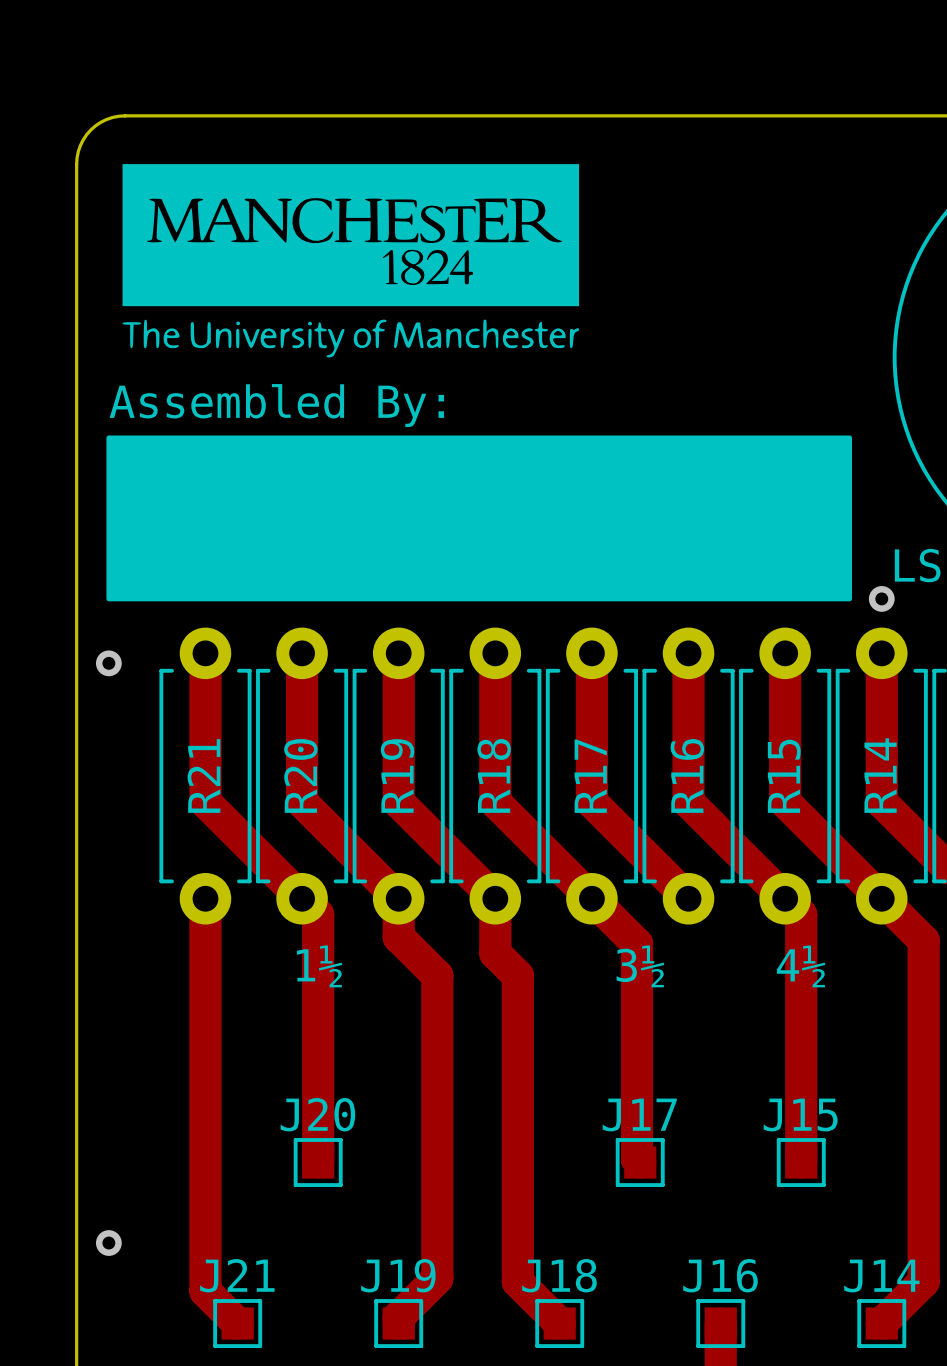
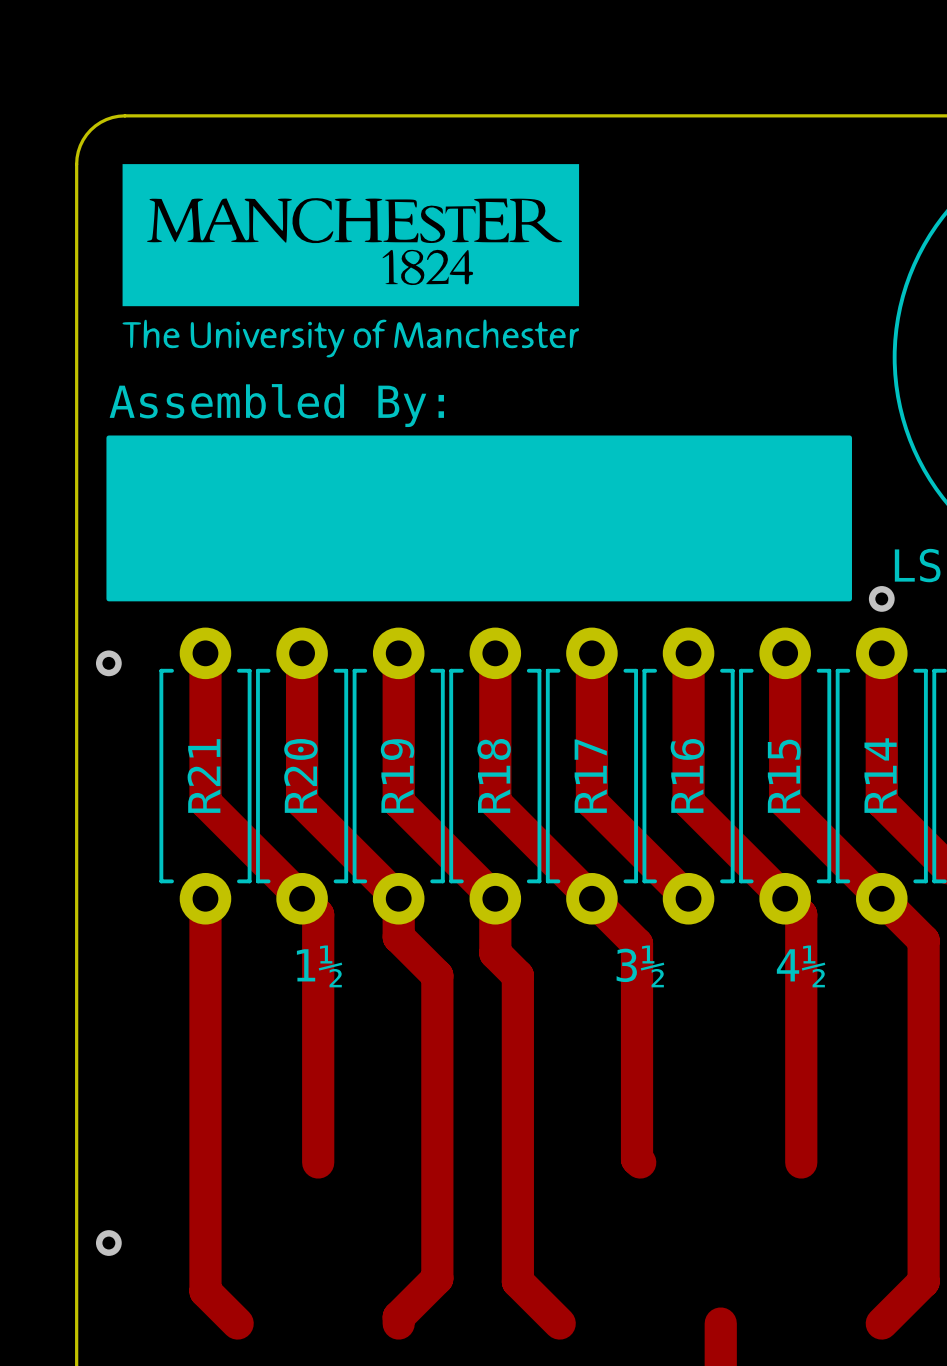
J20: (318, 1162) -> none
J17: (640, 1162) -> none
J15: (801, 1162) -> none
J21: (237, 1323) -> none
J19: (398, 1323) -> none
J18: (559, 1323) -> none
J16: (720, 1323) -> none
J14: (881, 1323) -> none

